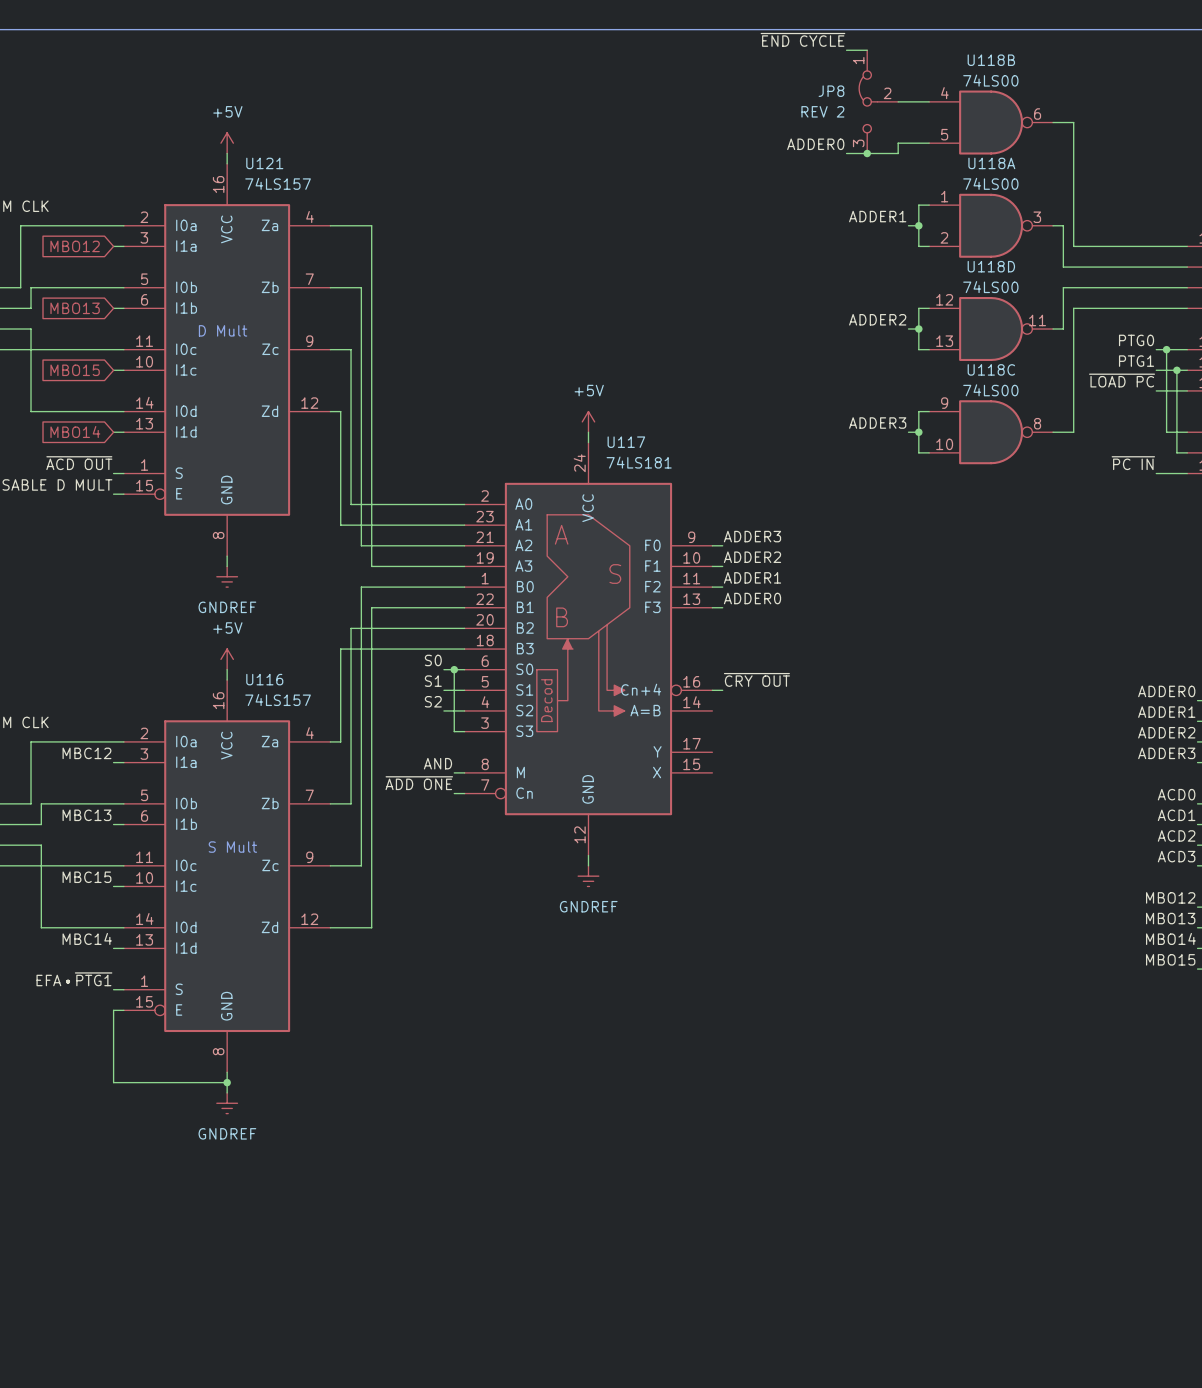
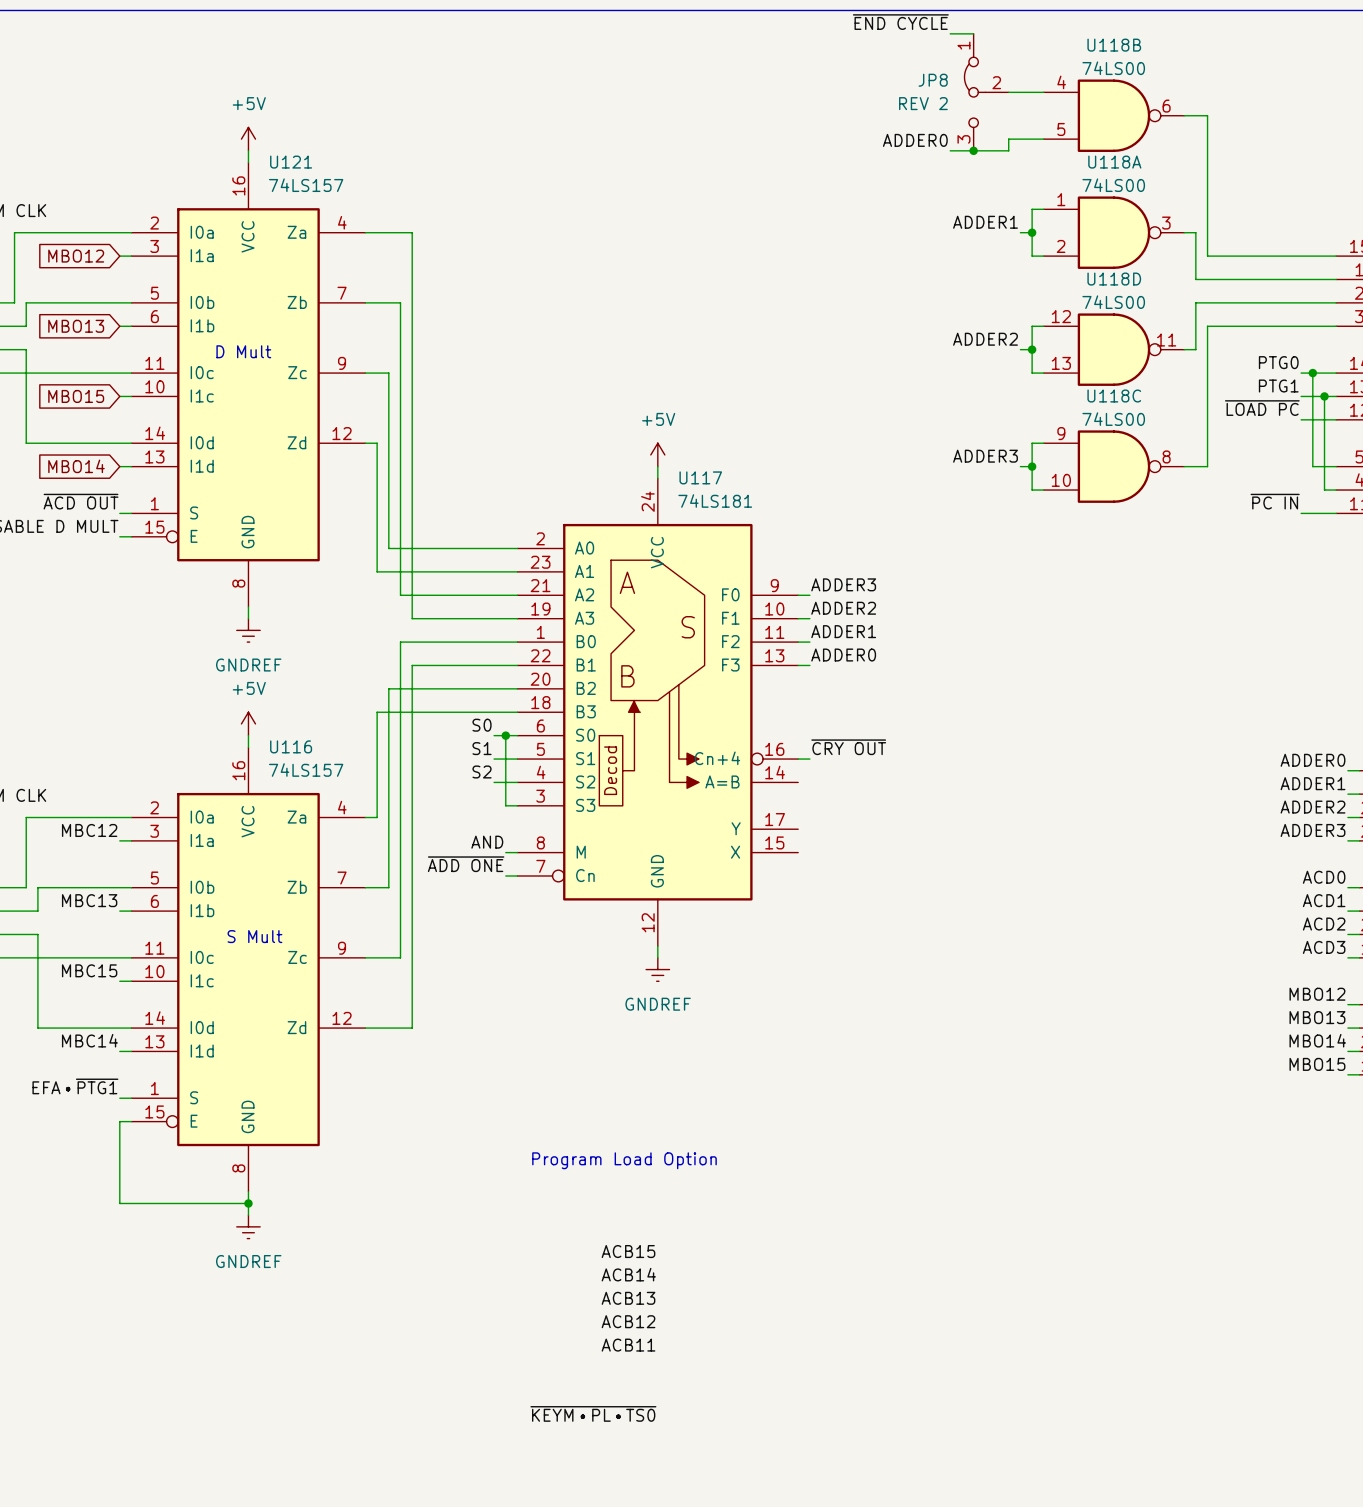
text: none -> Program Load Option (624, 1160)
label: none -> ACB15 (628, 1251)
label: none -> ACB14 (628, 1274)
label: none -> ACB13 (628, 1298)
label: none -> ACB12 (628, 1321)
label: none -> ACB11 (628, 1345)
label: none -> ~{KEYM•PL•TS0} (593, 1413)

